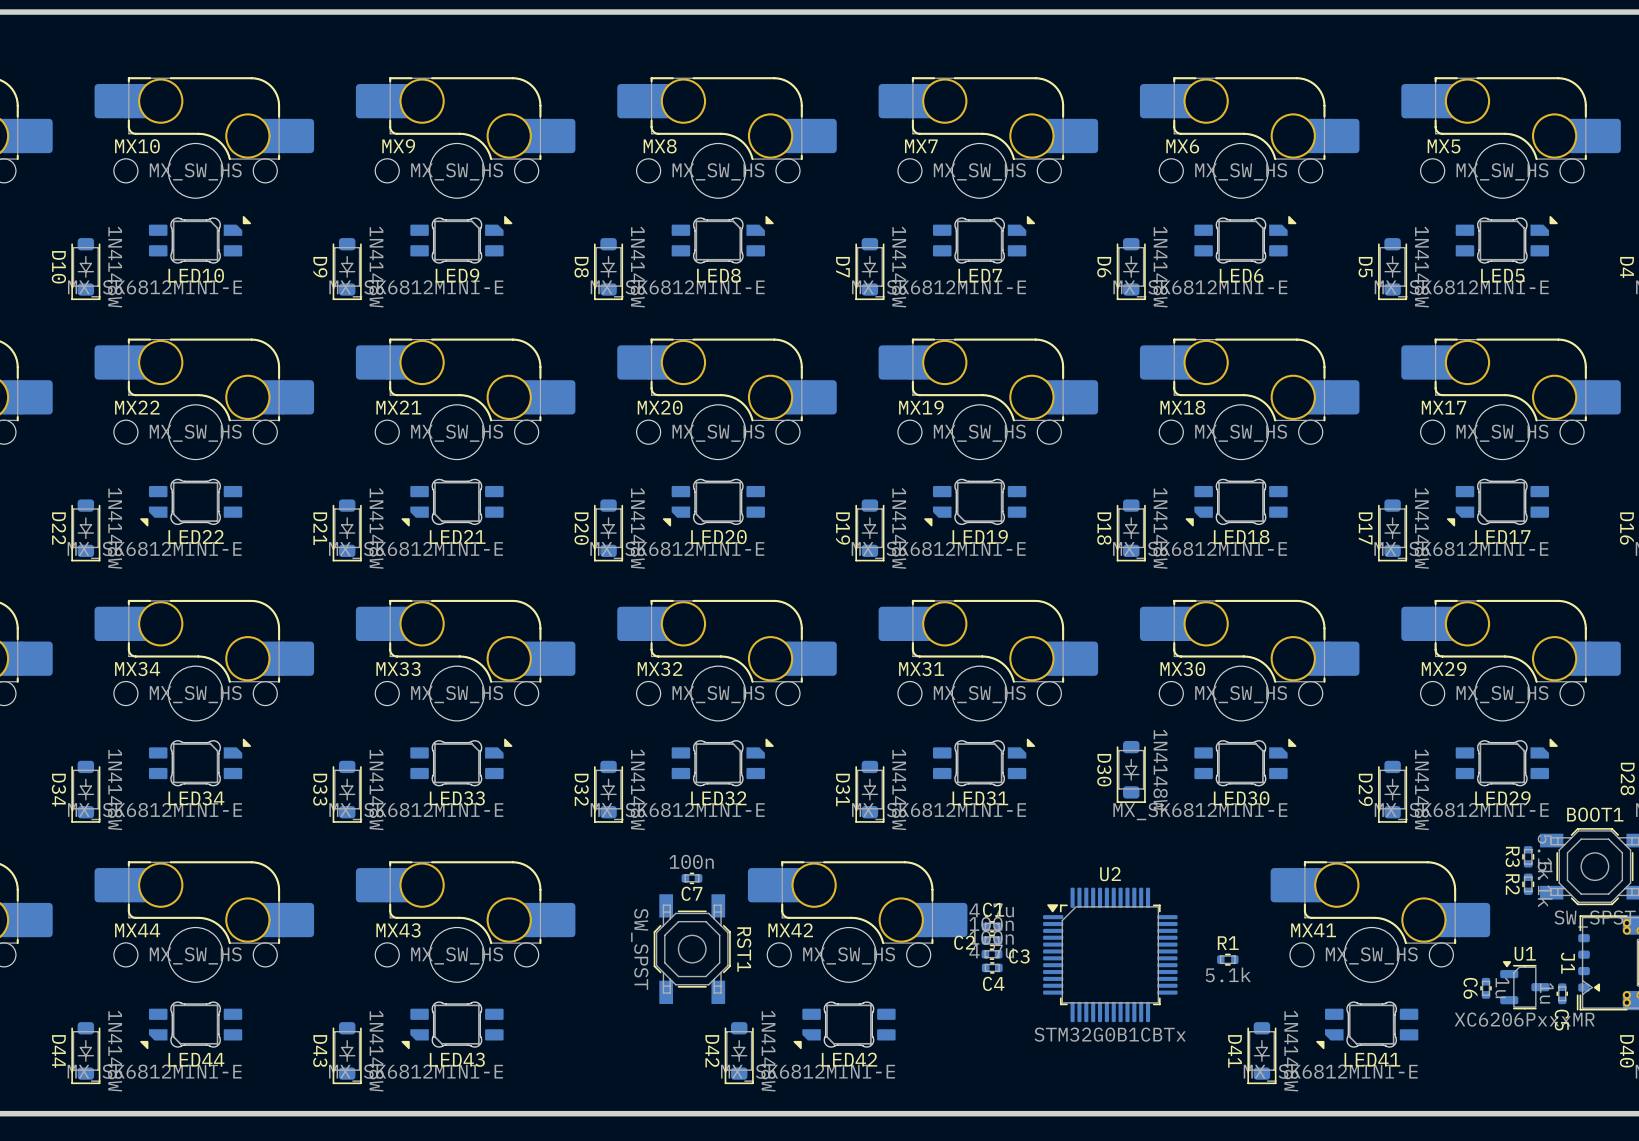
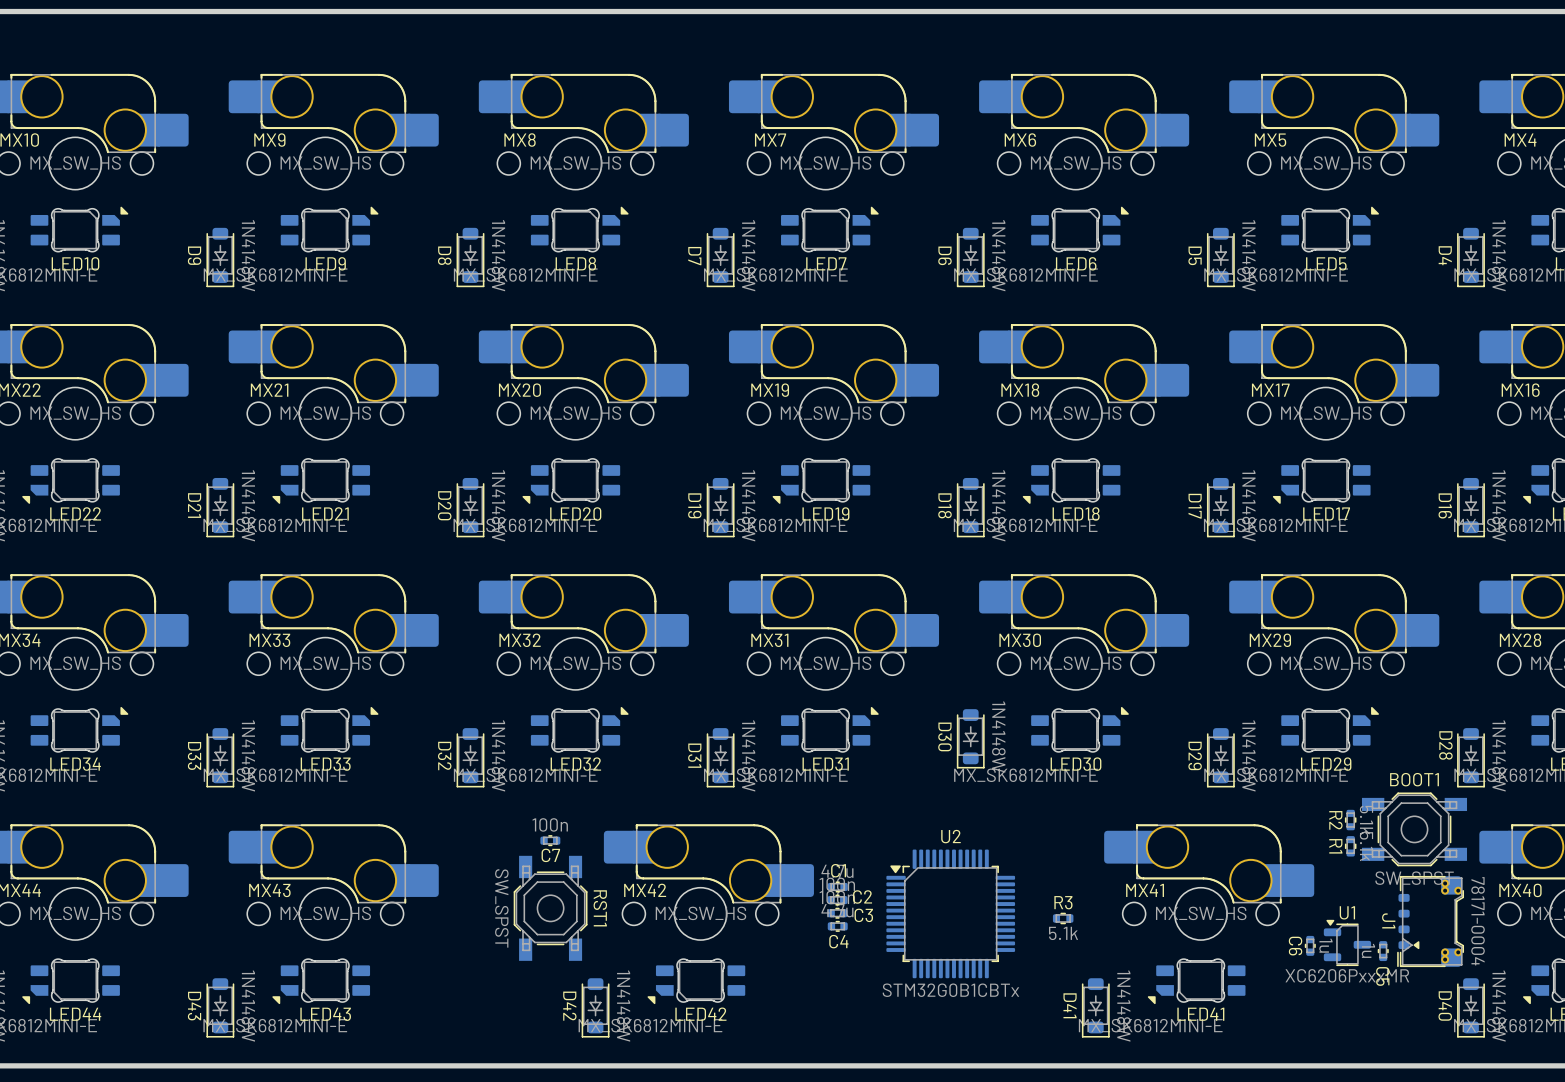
R3 name: R3 (1512, 856) -> R2 (1335, 820)
R2 name: R2 (1512, 884) -> R1 (1335, 846)
C2 name position: C2 (964, 942) -> C2 (862, 896)
R1 name: R1 (1228, 943) -> R3 (1063, 902)

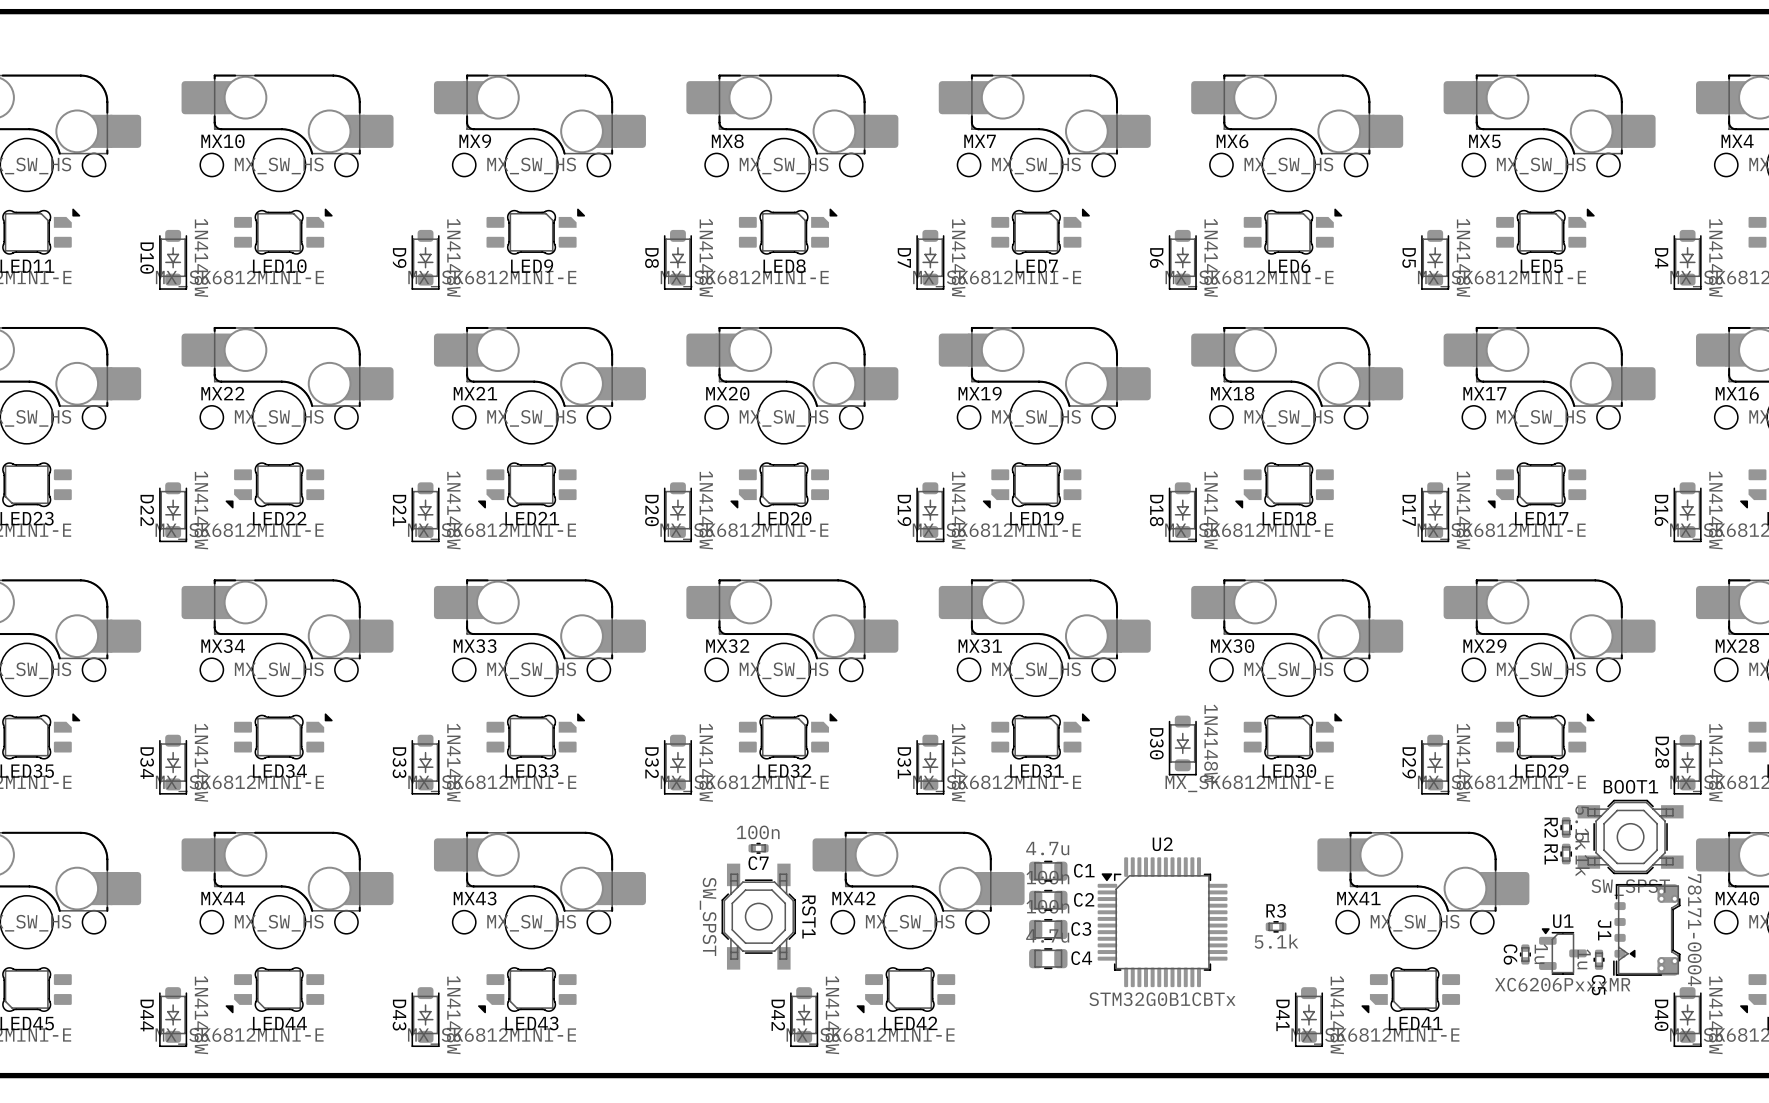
C1 name position: C1 (838, 870) -> C1 (1084, 870)
C1 footprint: [827, 881, 848, 893] -> [1029, 860, 1068, 882]
C2 footprint: [827, 894, 848, 906] -> [1029, 889, 1068, 911]
C3 footprint: [827, 907, 848, 919] -> [1029, 918, 1068, 941]
C4 footprint: [827, 920, 848, 932] -> [1029, 948, 1068, 970]
C4 name position: C4 (838, 941) -> C4 (1081, 958)

